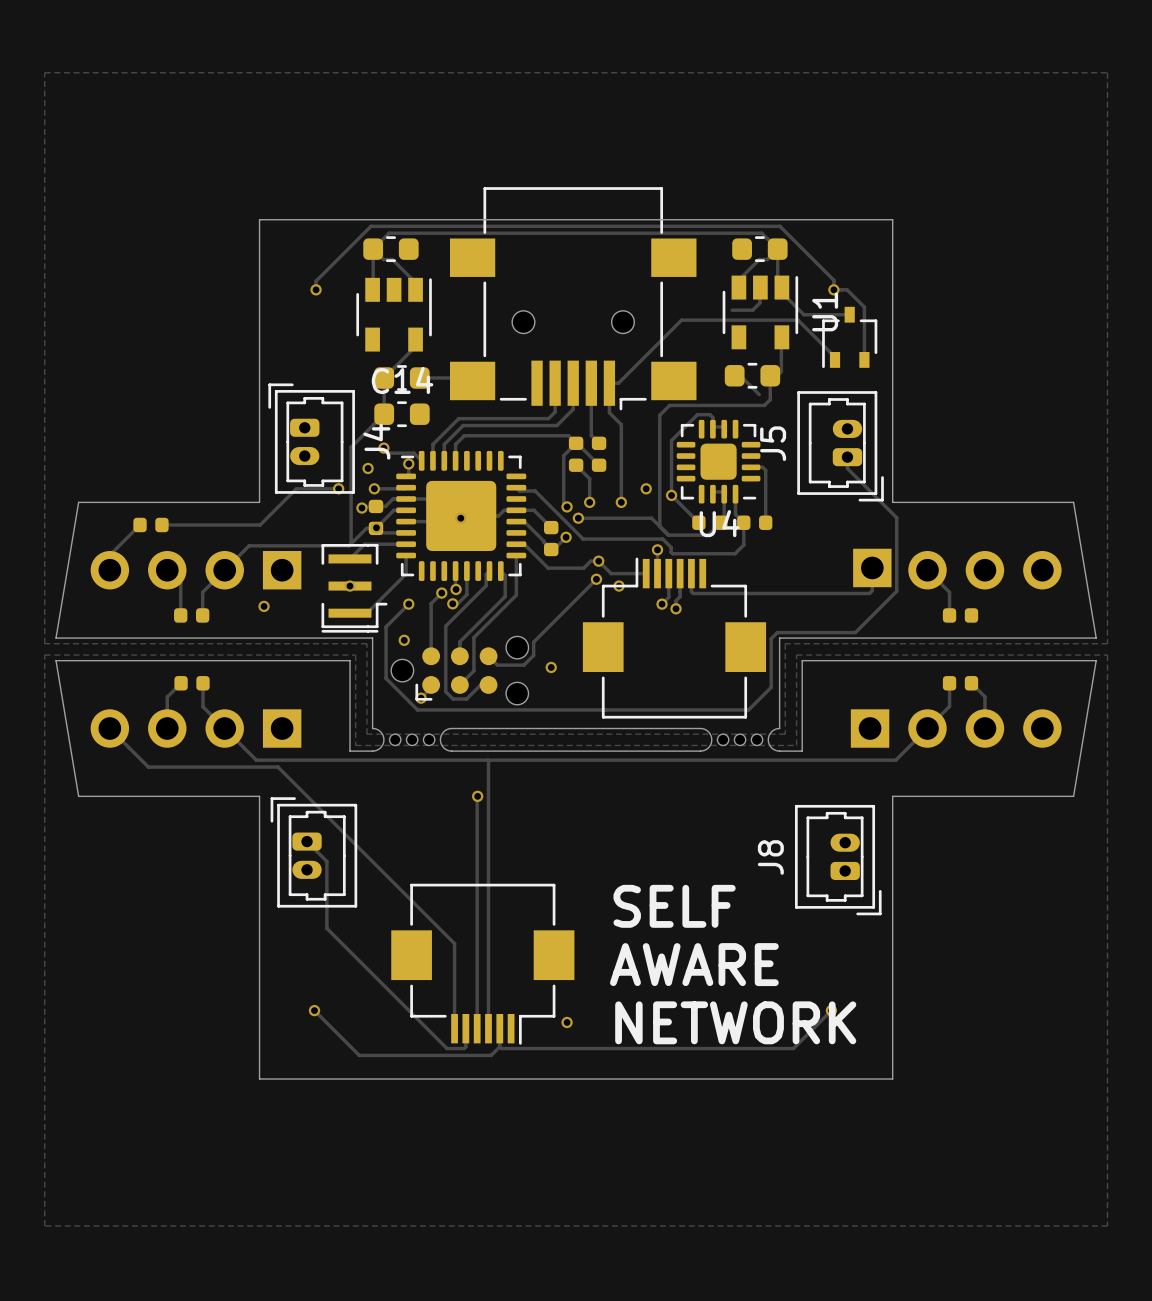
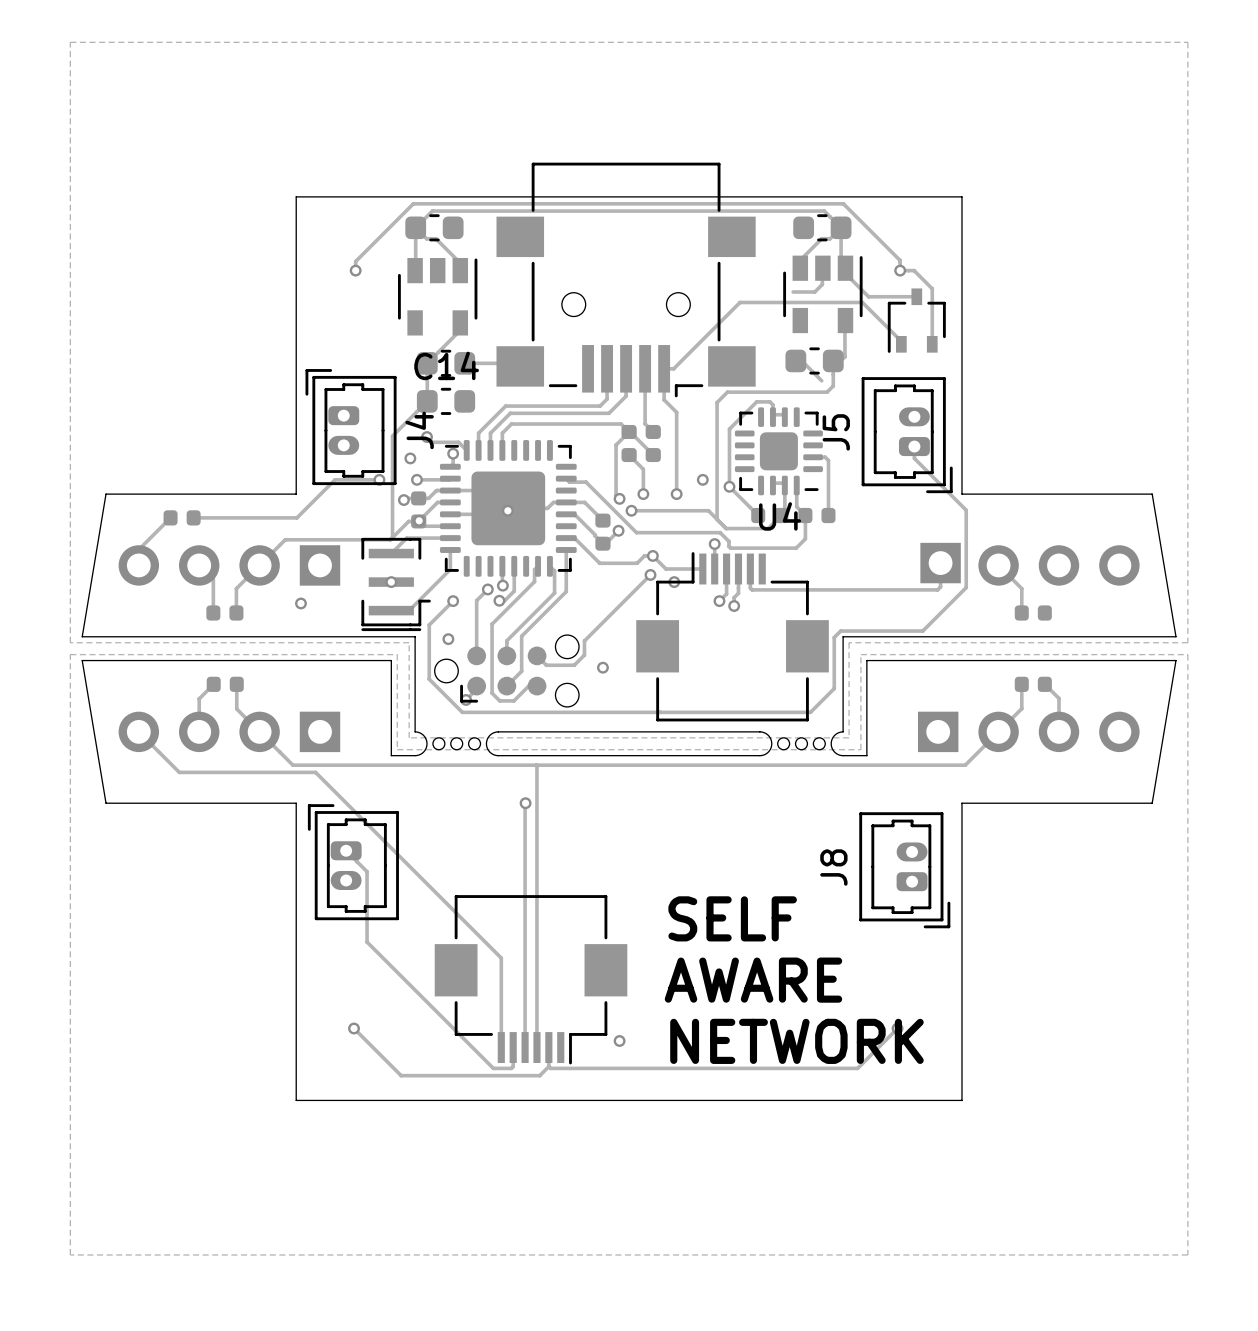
U1 name: U1 (825, 311) -> none

